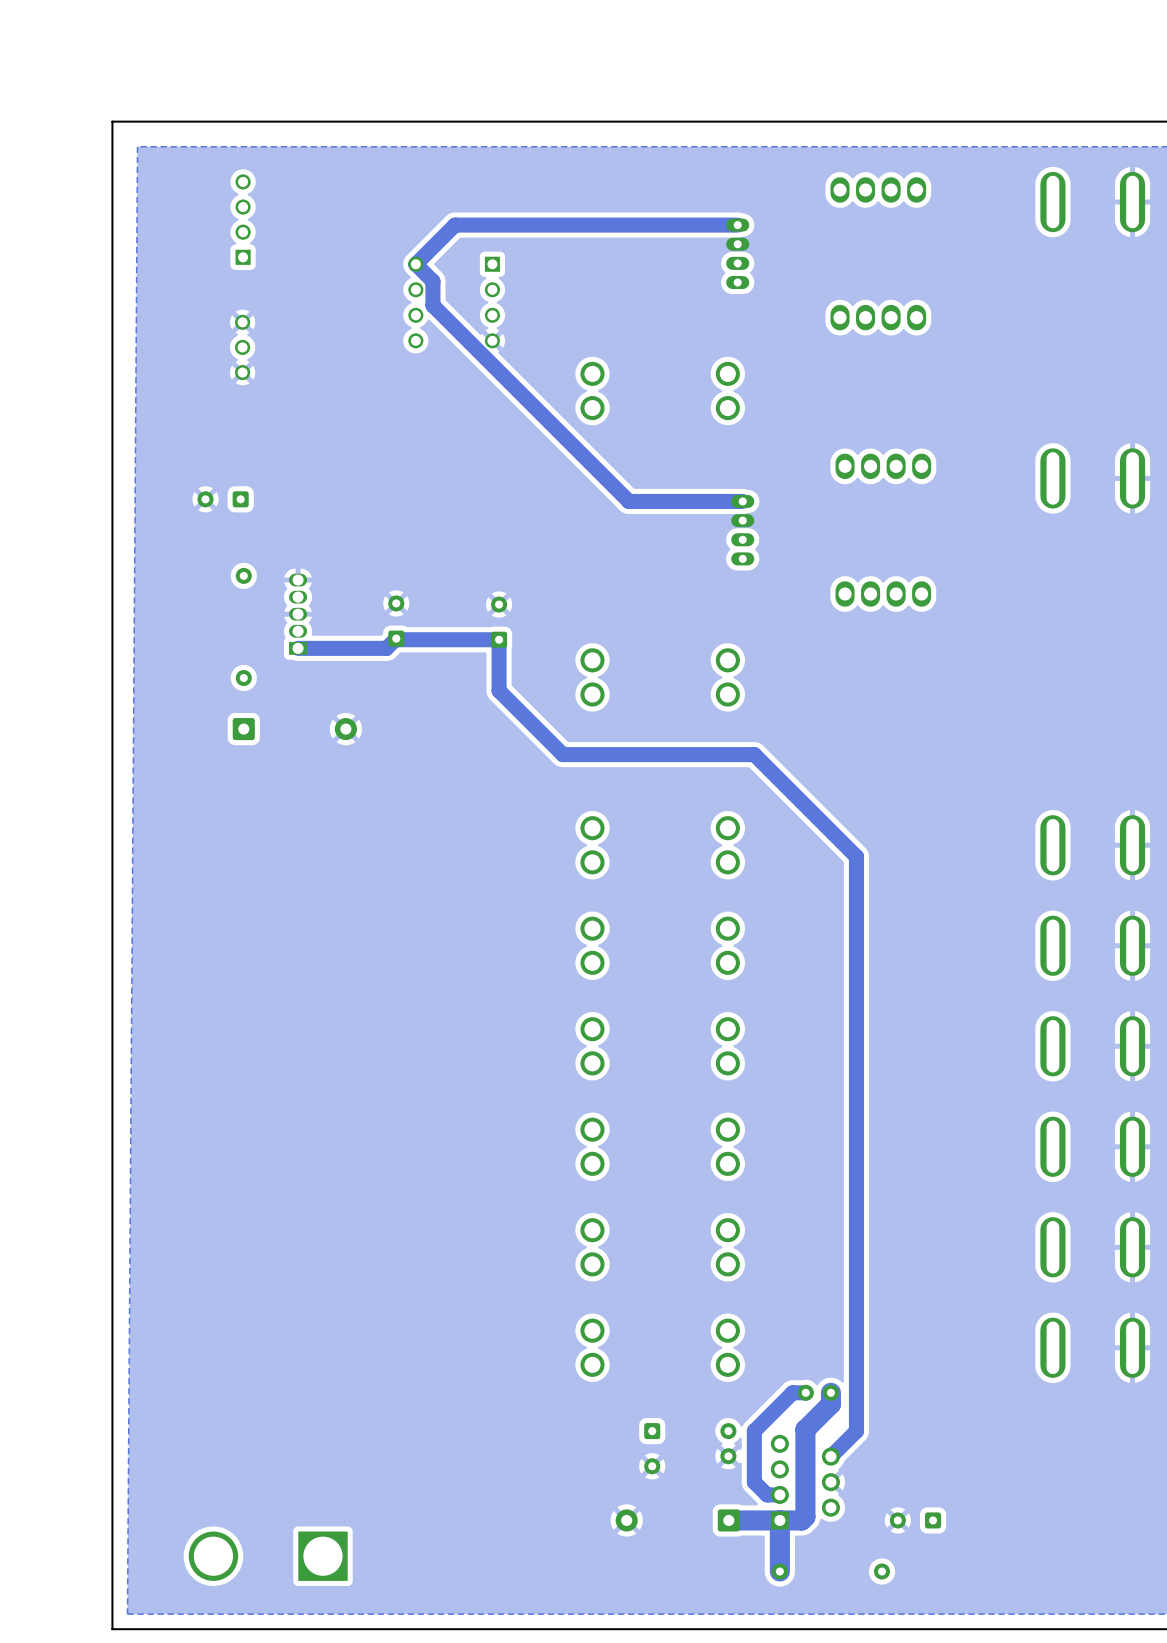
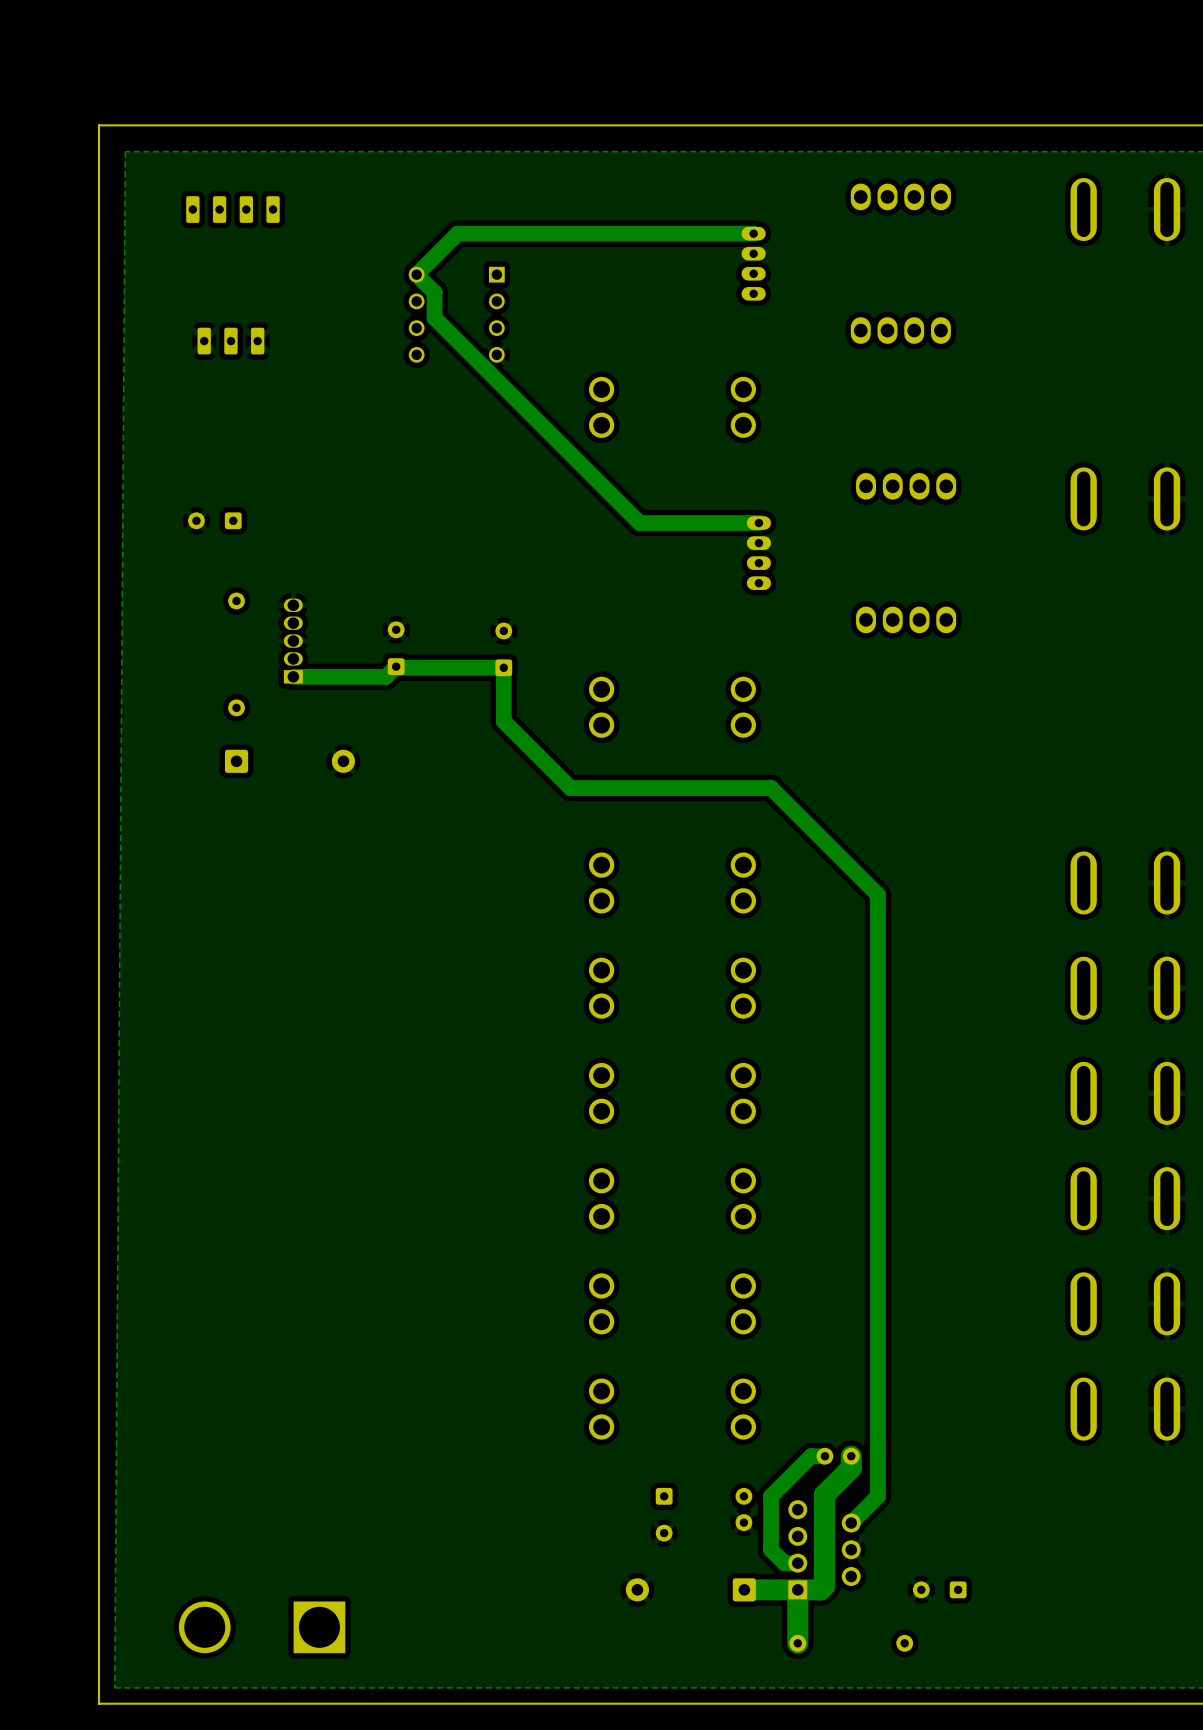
part: none -> (232, 209)
part: (243, 219) -> none
part: none -> (230, 341)
part: (242, 347) -> none

